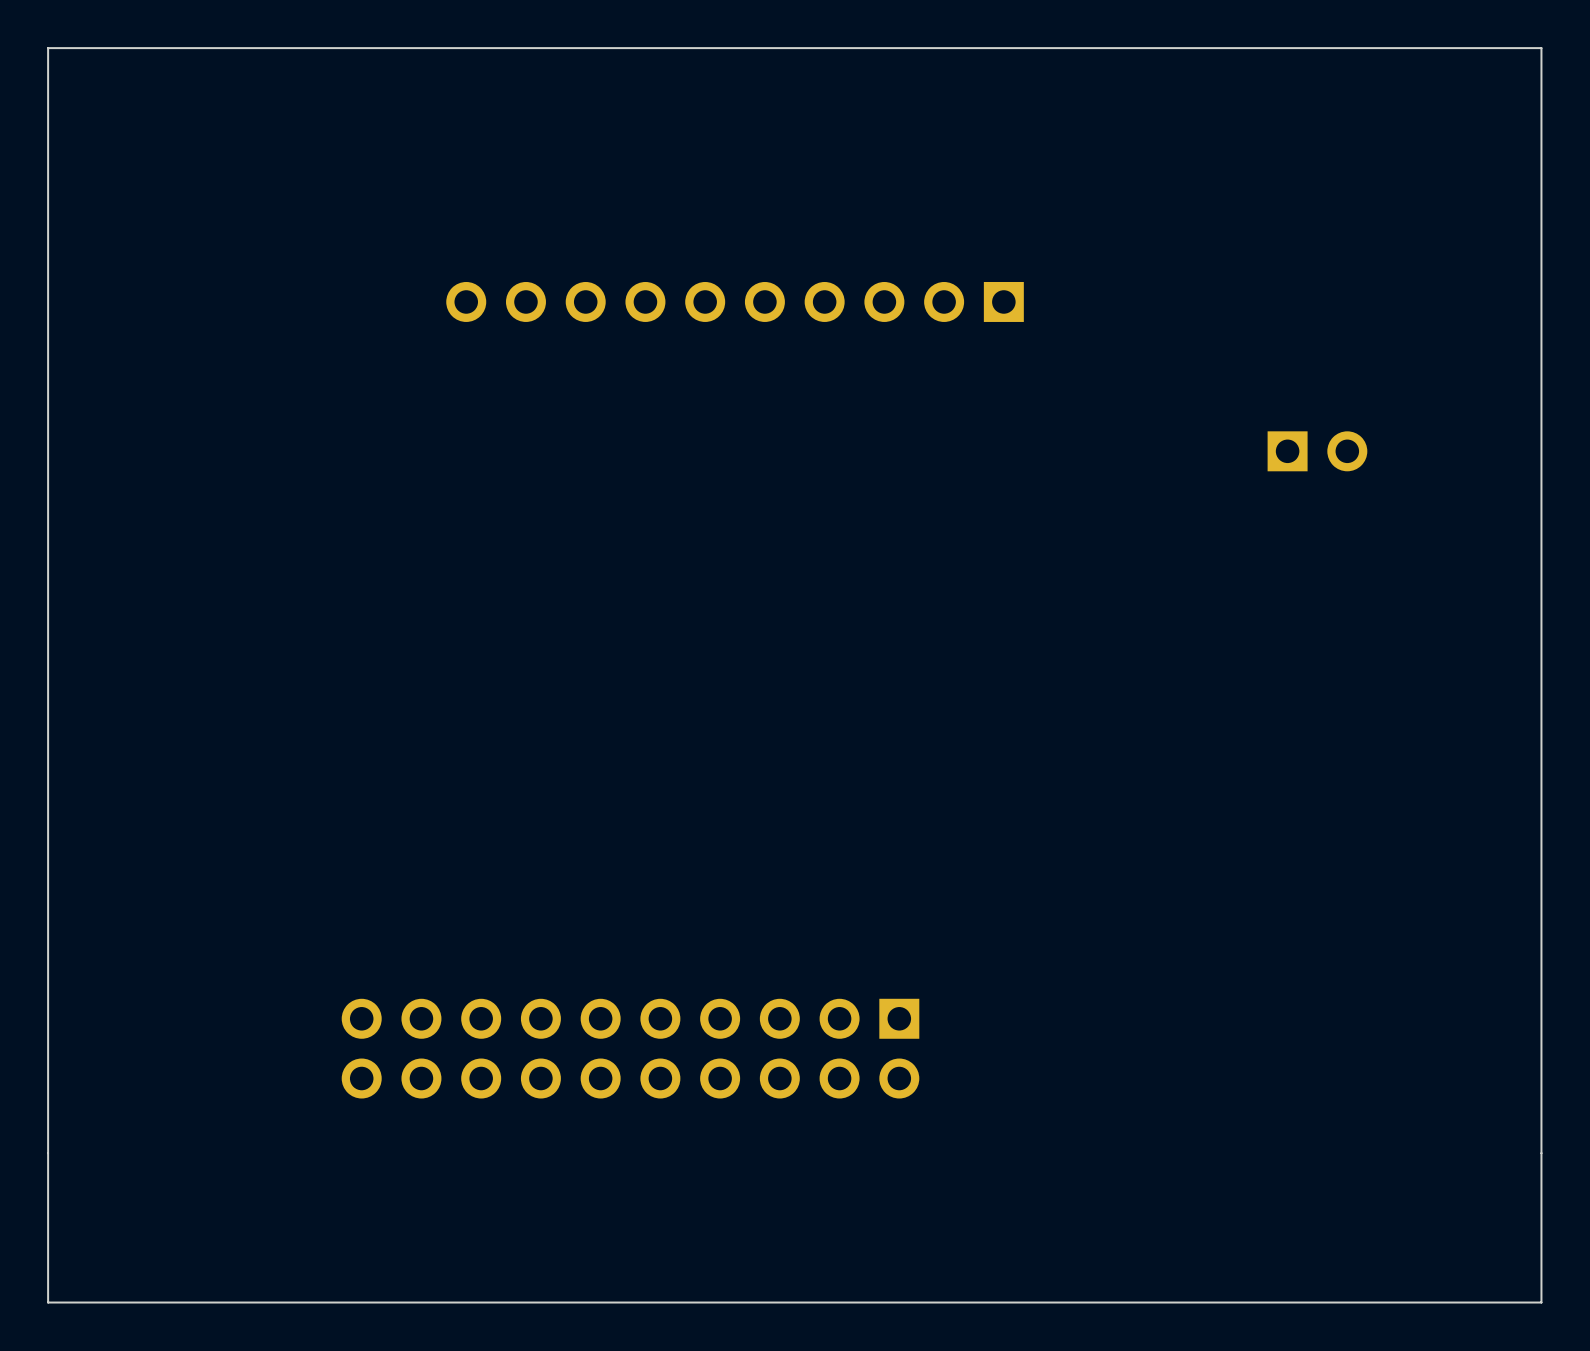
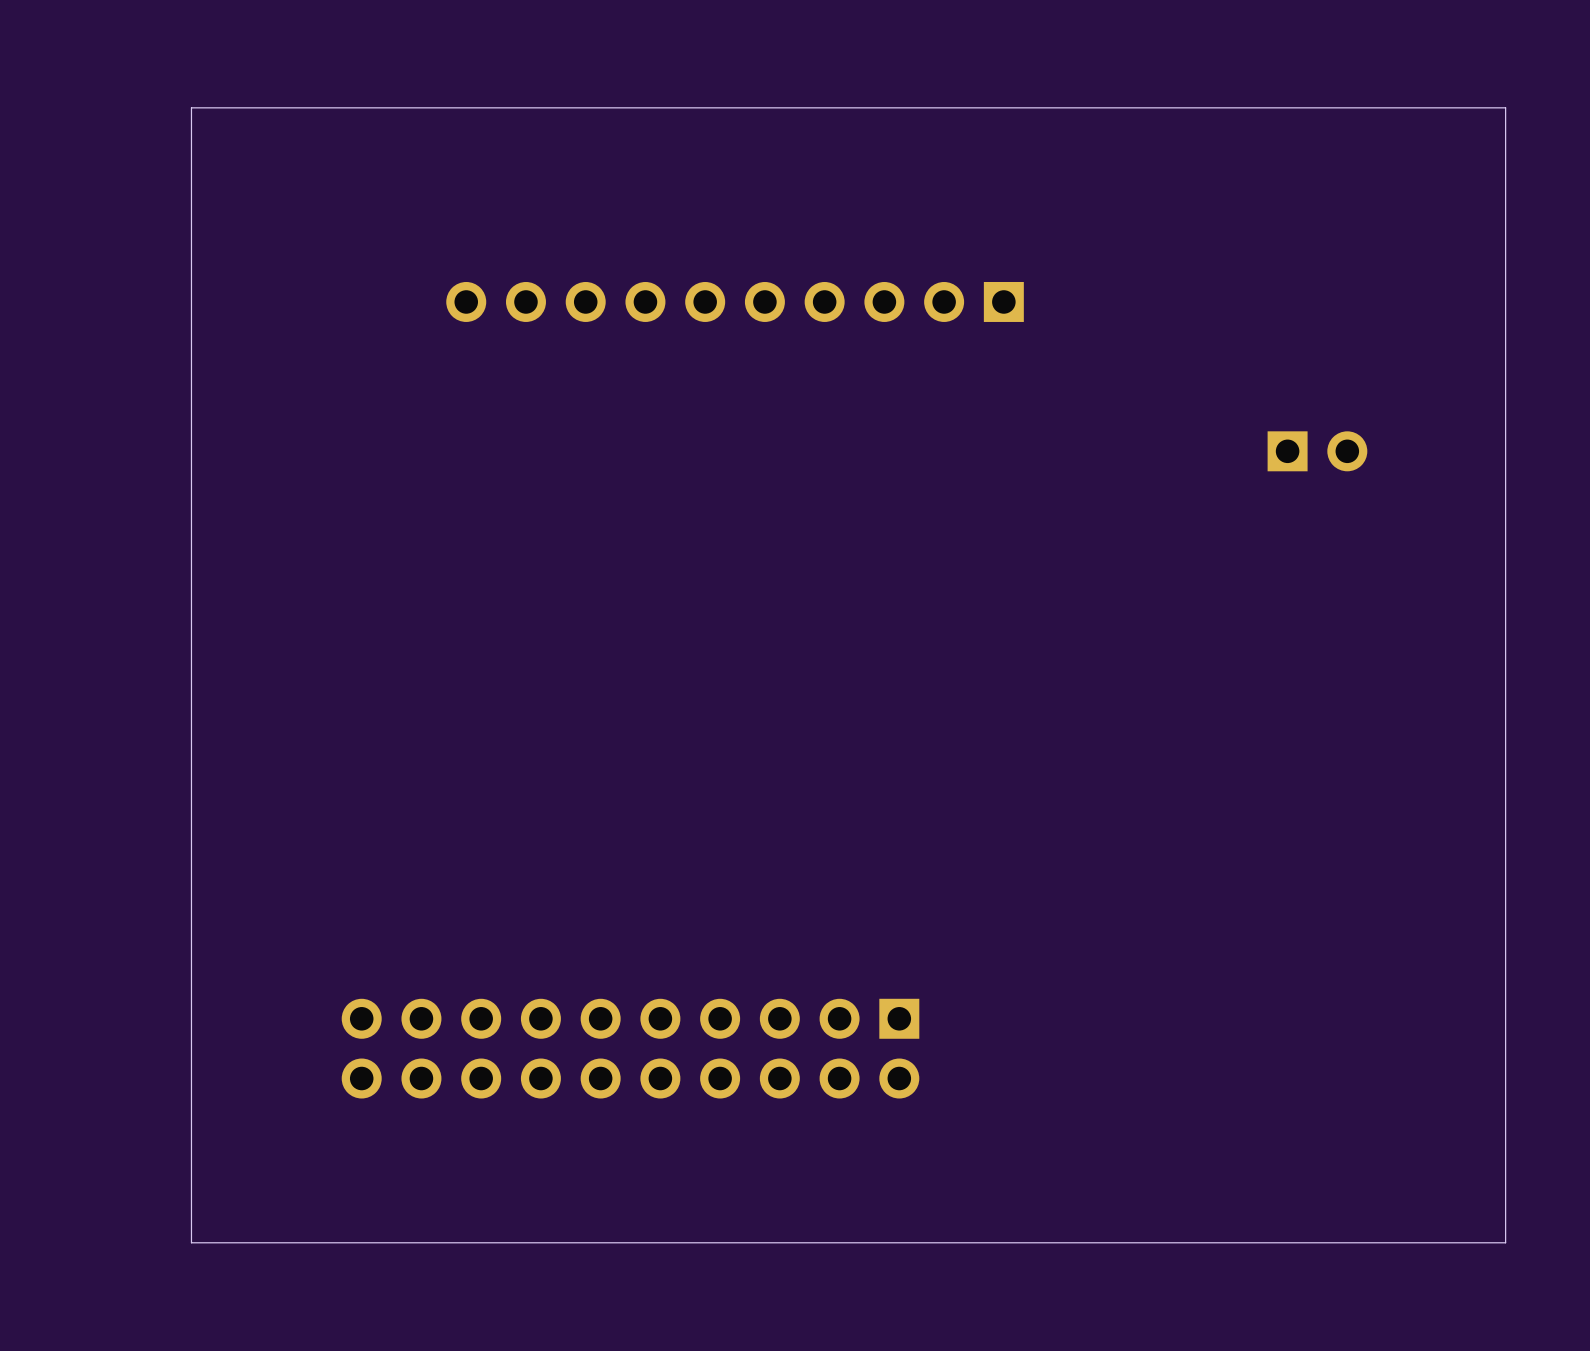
board edge: (1541, 48) (1541, 1302) (48, 1302) (48, 48) (1541, 48) -> (1505, 107) (1505, 1242) (191, 1242) (191, 107) (1505, 107)

